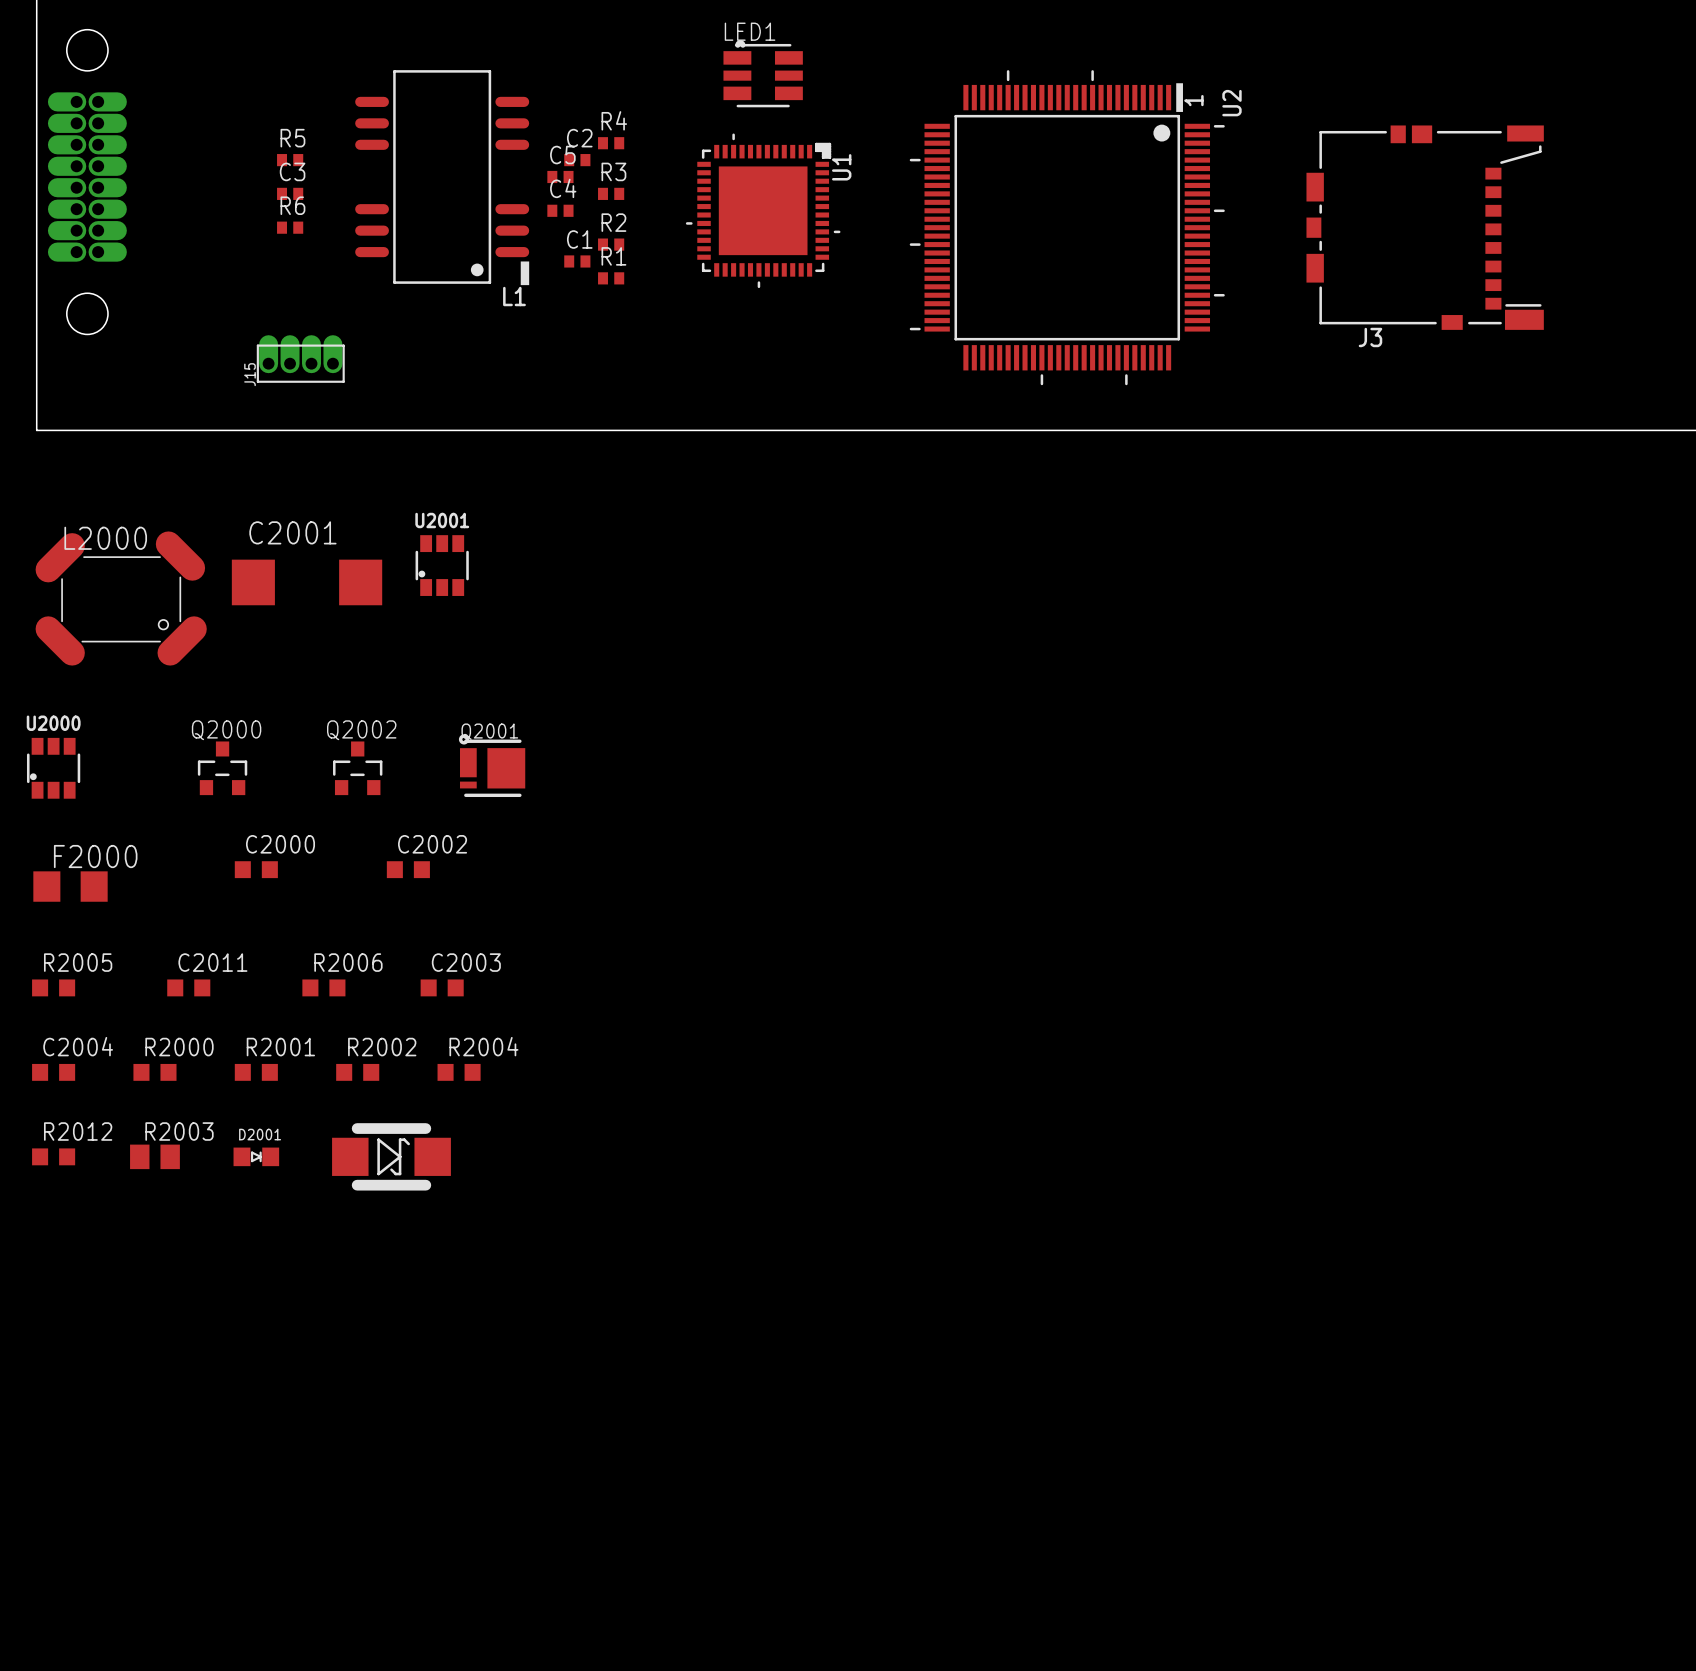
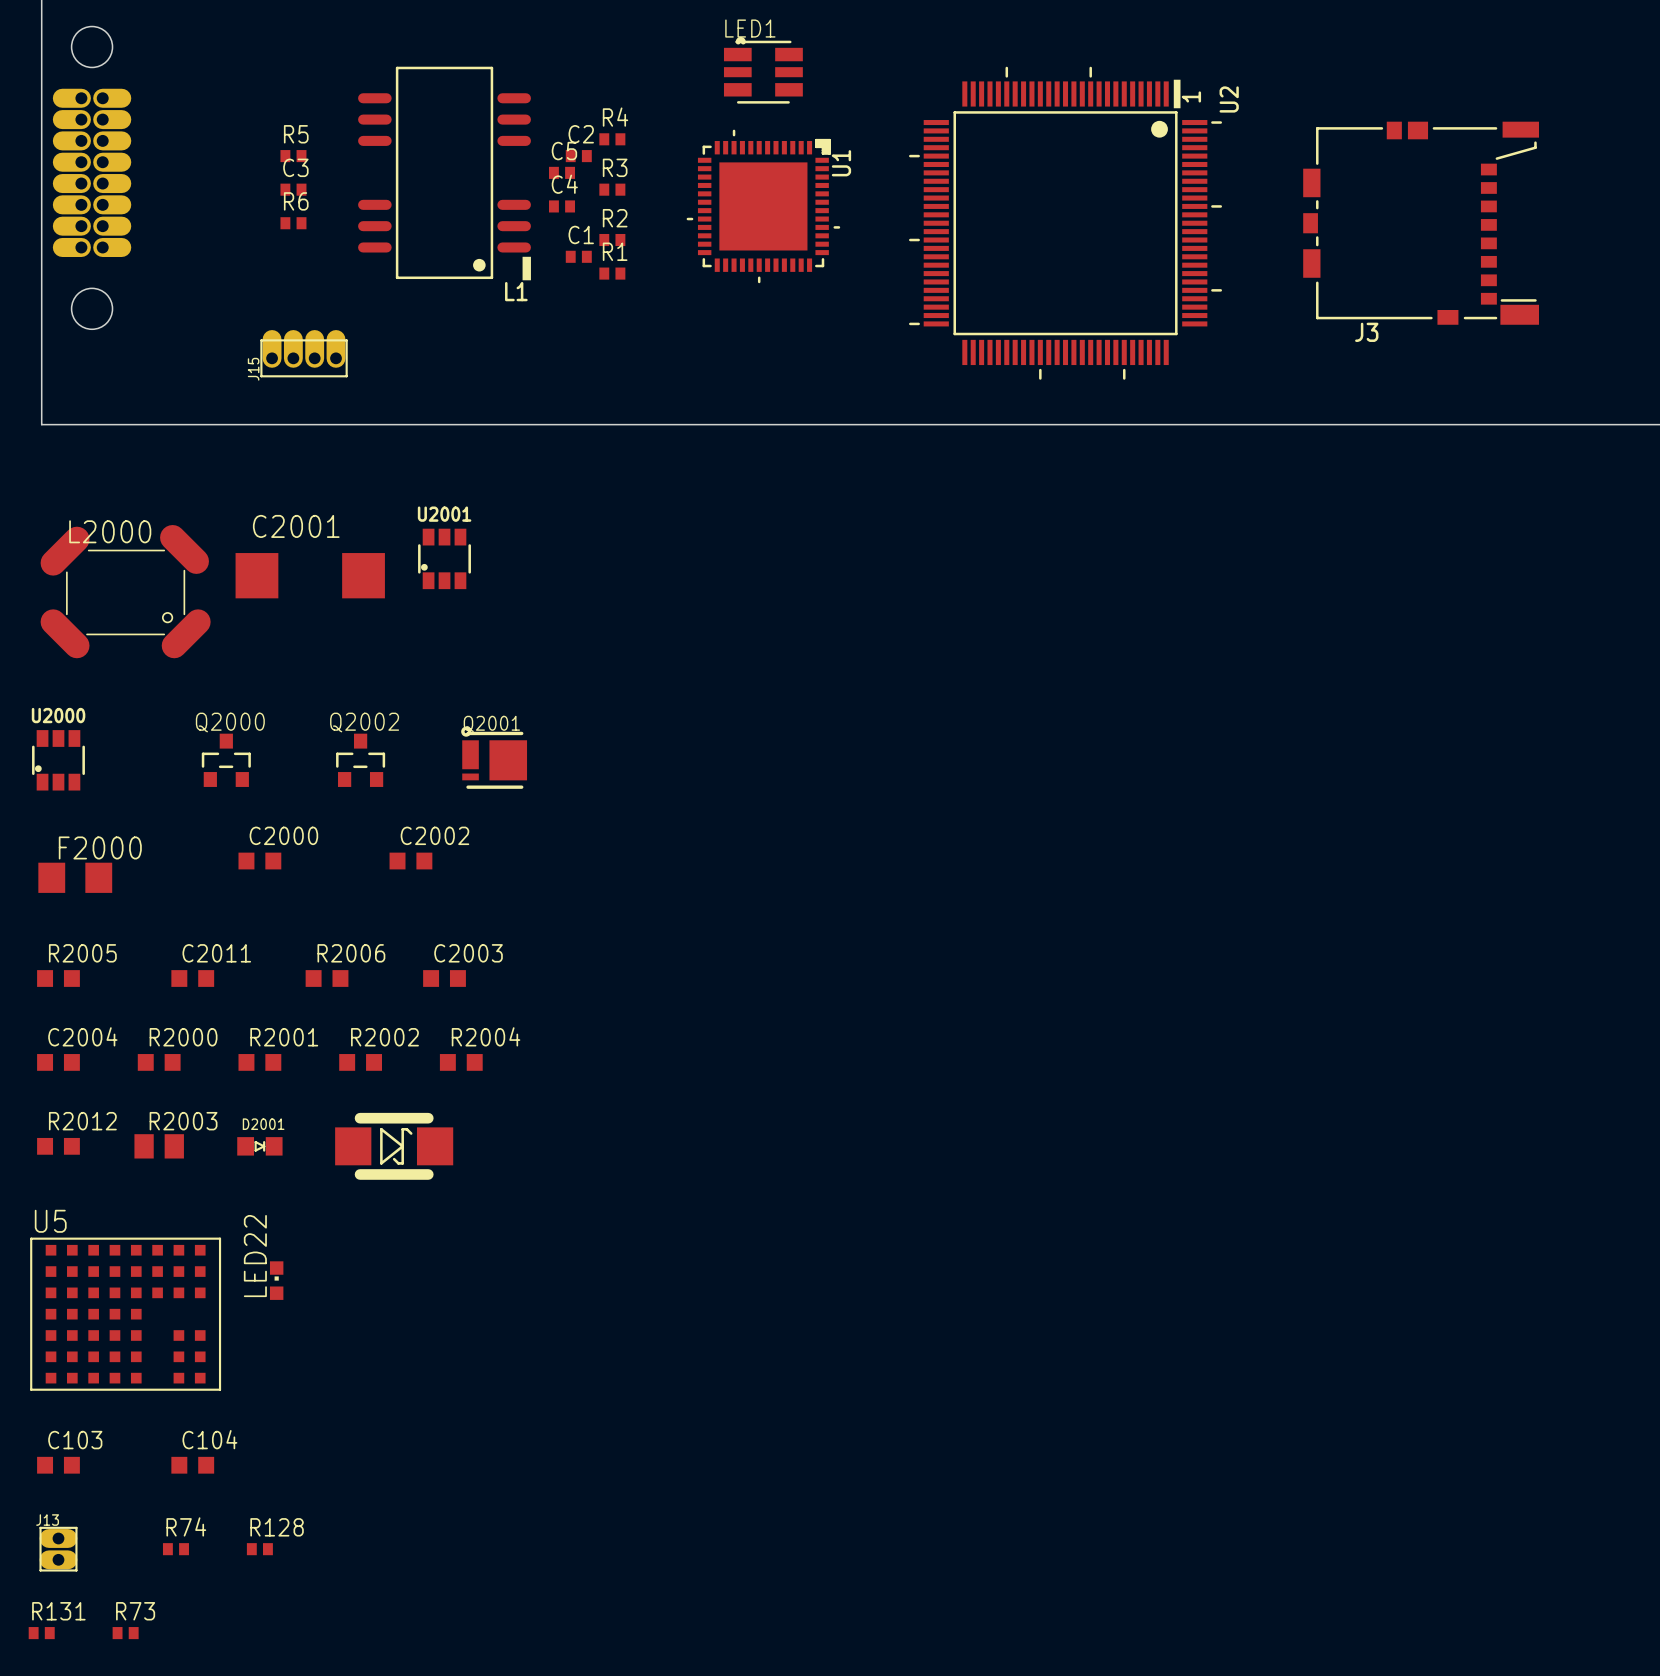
LED22: none -> (276, 1280)
U5: none -> (125, 1314)
C103: none -> (58, 1465)
C104: none -> (192, 1465)
J13: none -> (58, 1549)
R74: none -> (175, 1549)
R128: none -> (259, 1549)
R131: none -> (41, 1633)
R73: none -> (125, 1633)

